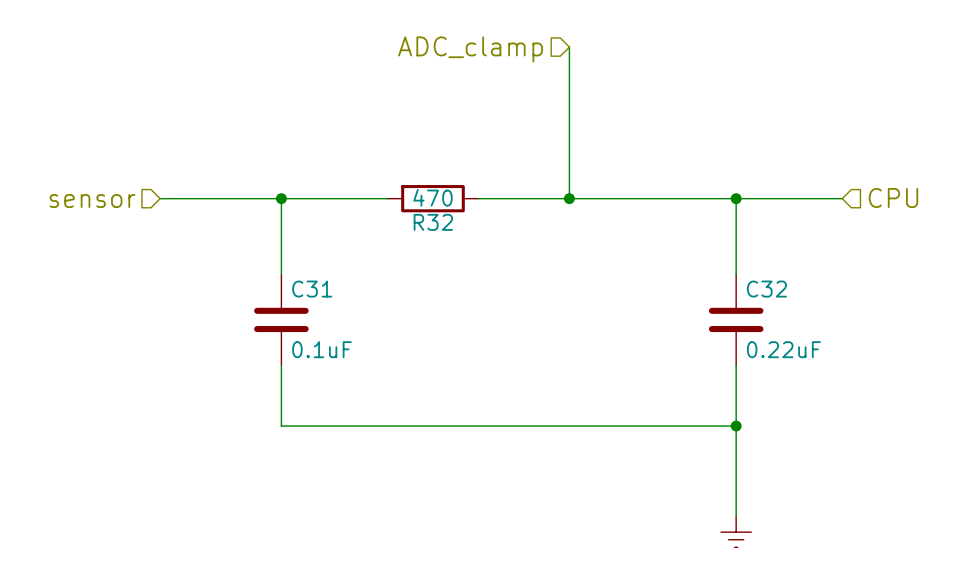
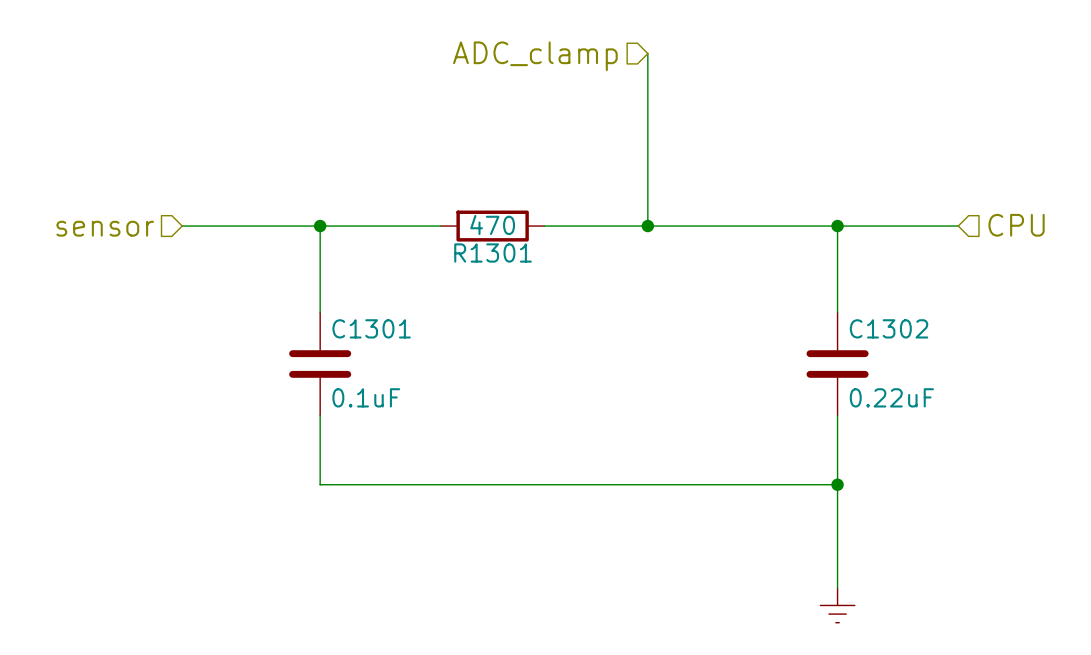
R32 name: R32 (433, 222) -> R1301 (493, 252)
C31 name: C31 (312, 289) -> C1301 (371, 328)
C32 name: C32 (766, 289) -> C1302 (889, 328)

